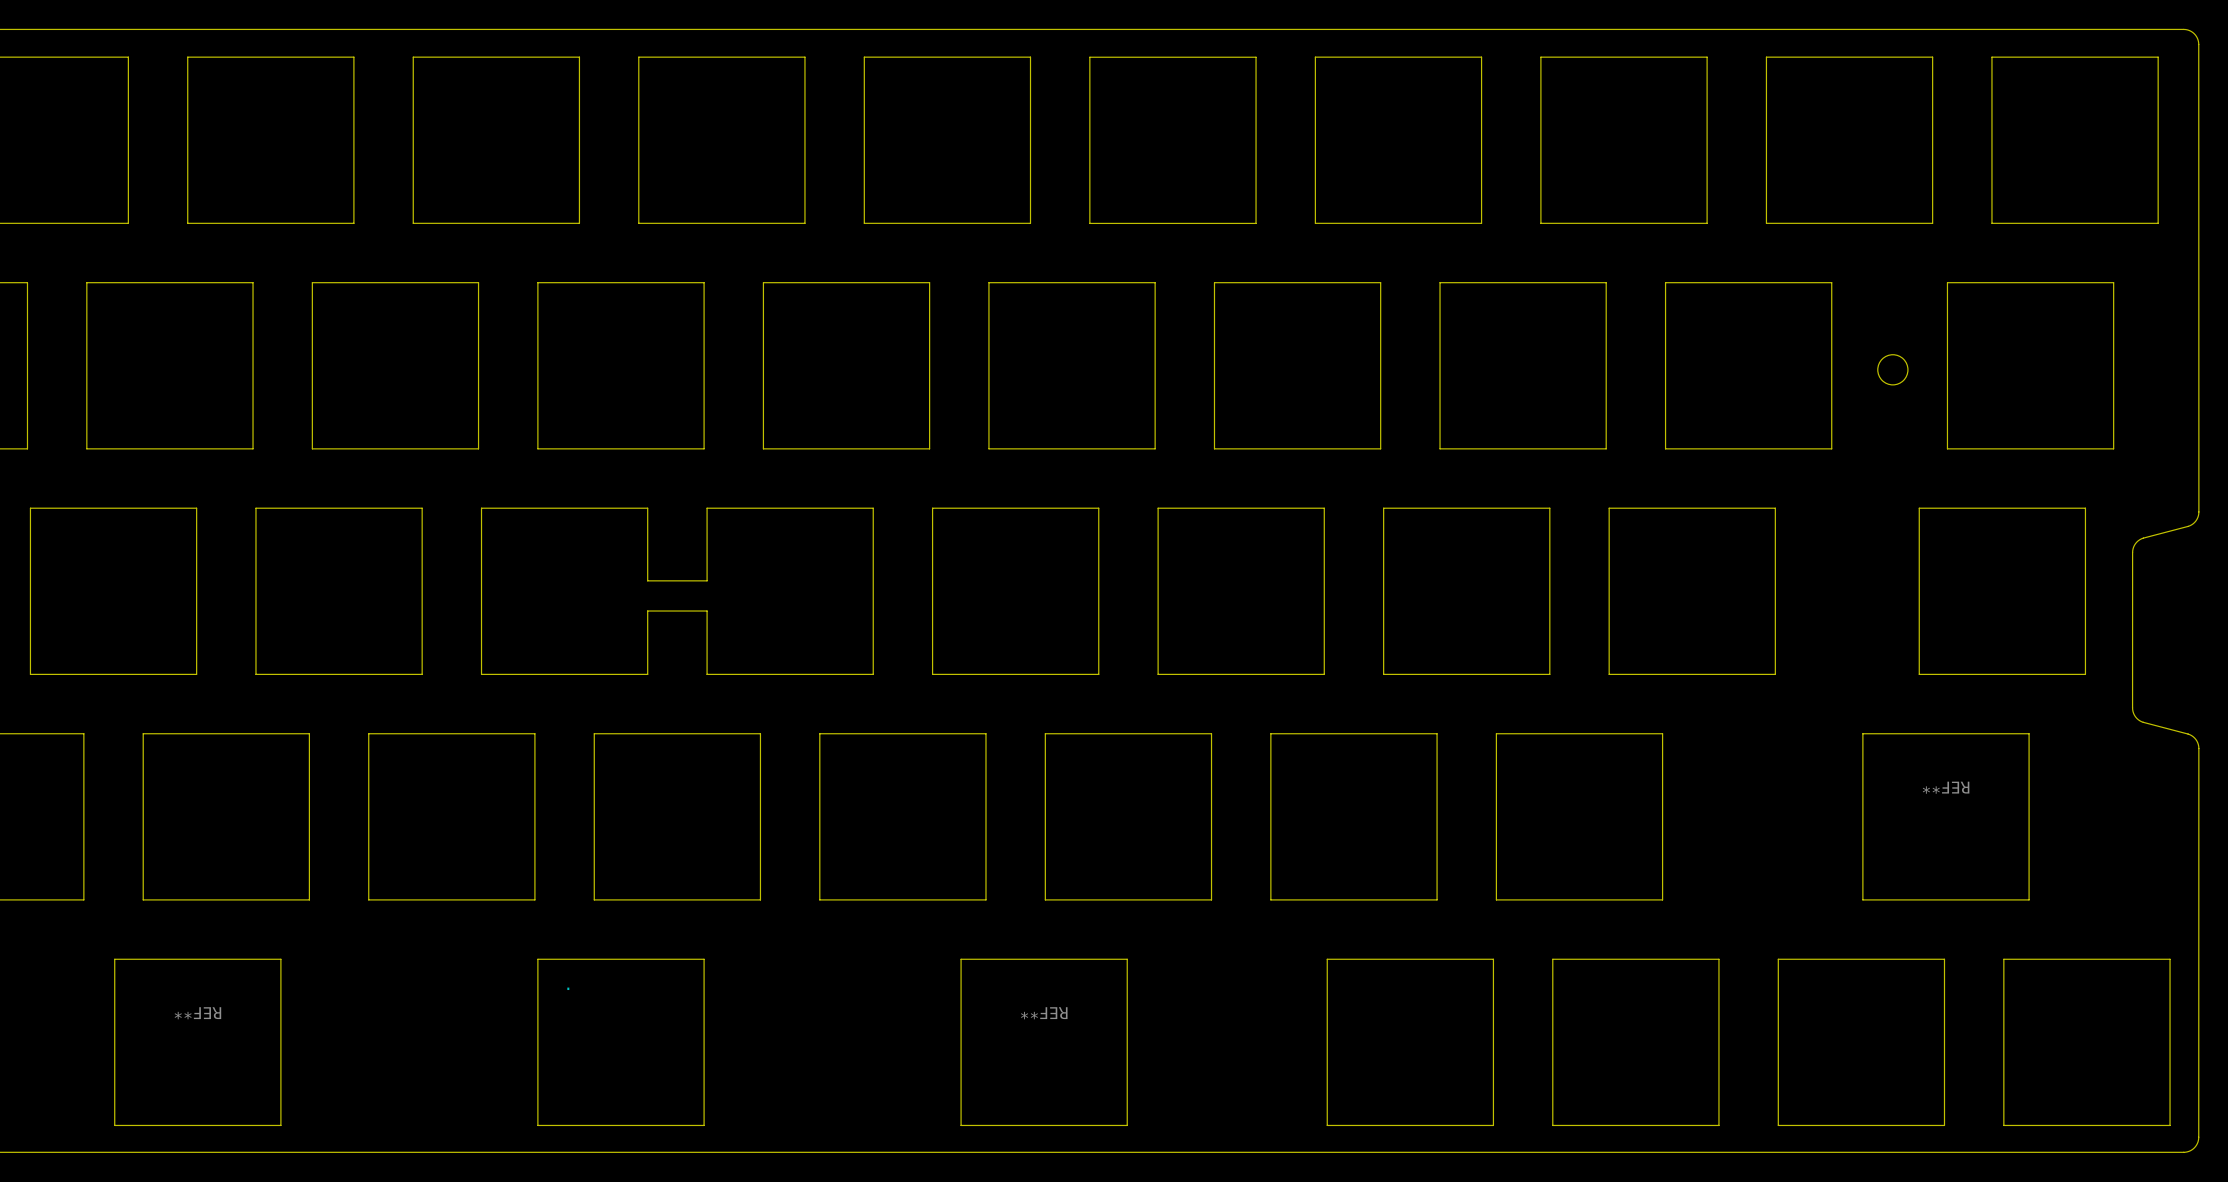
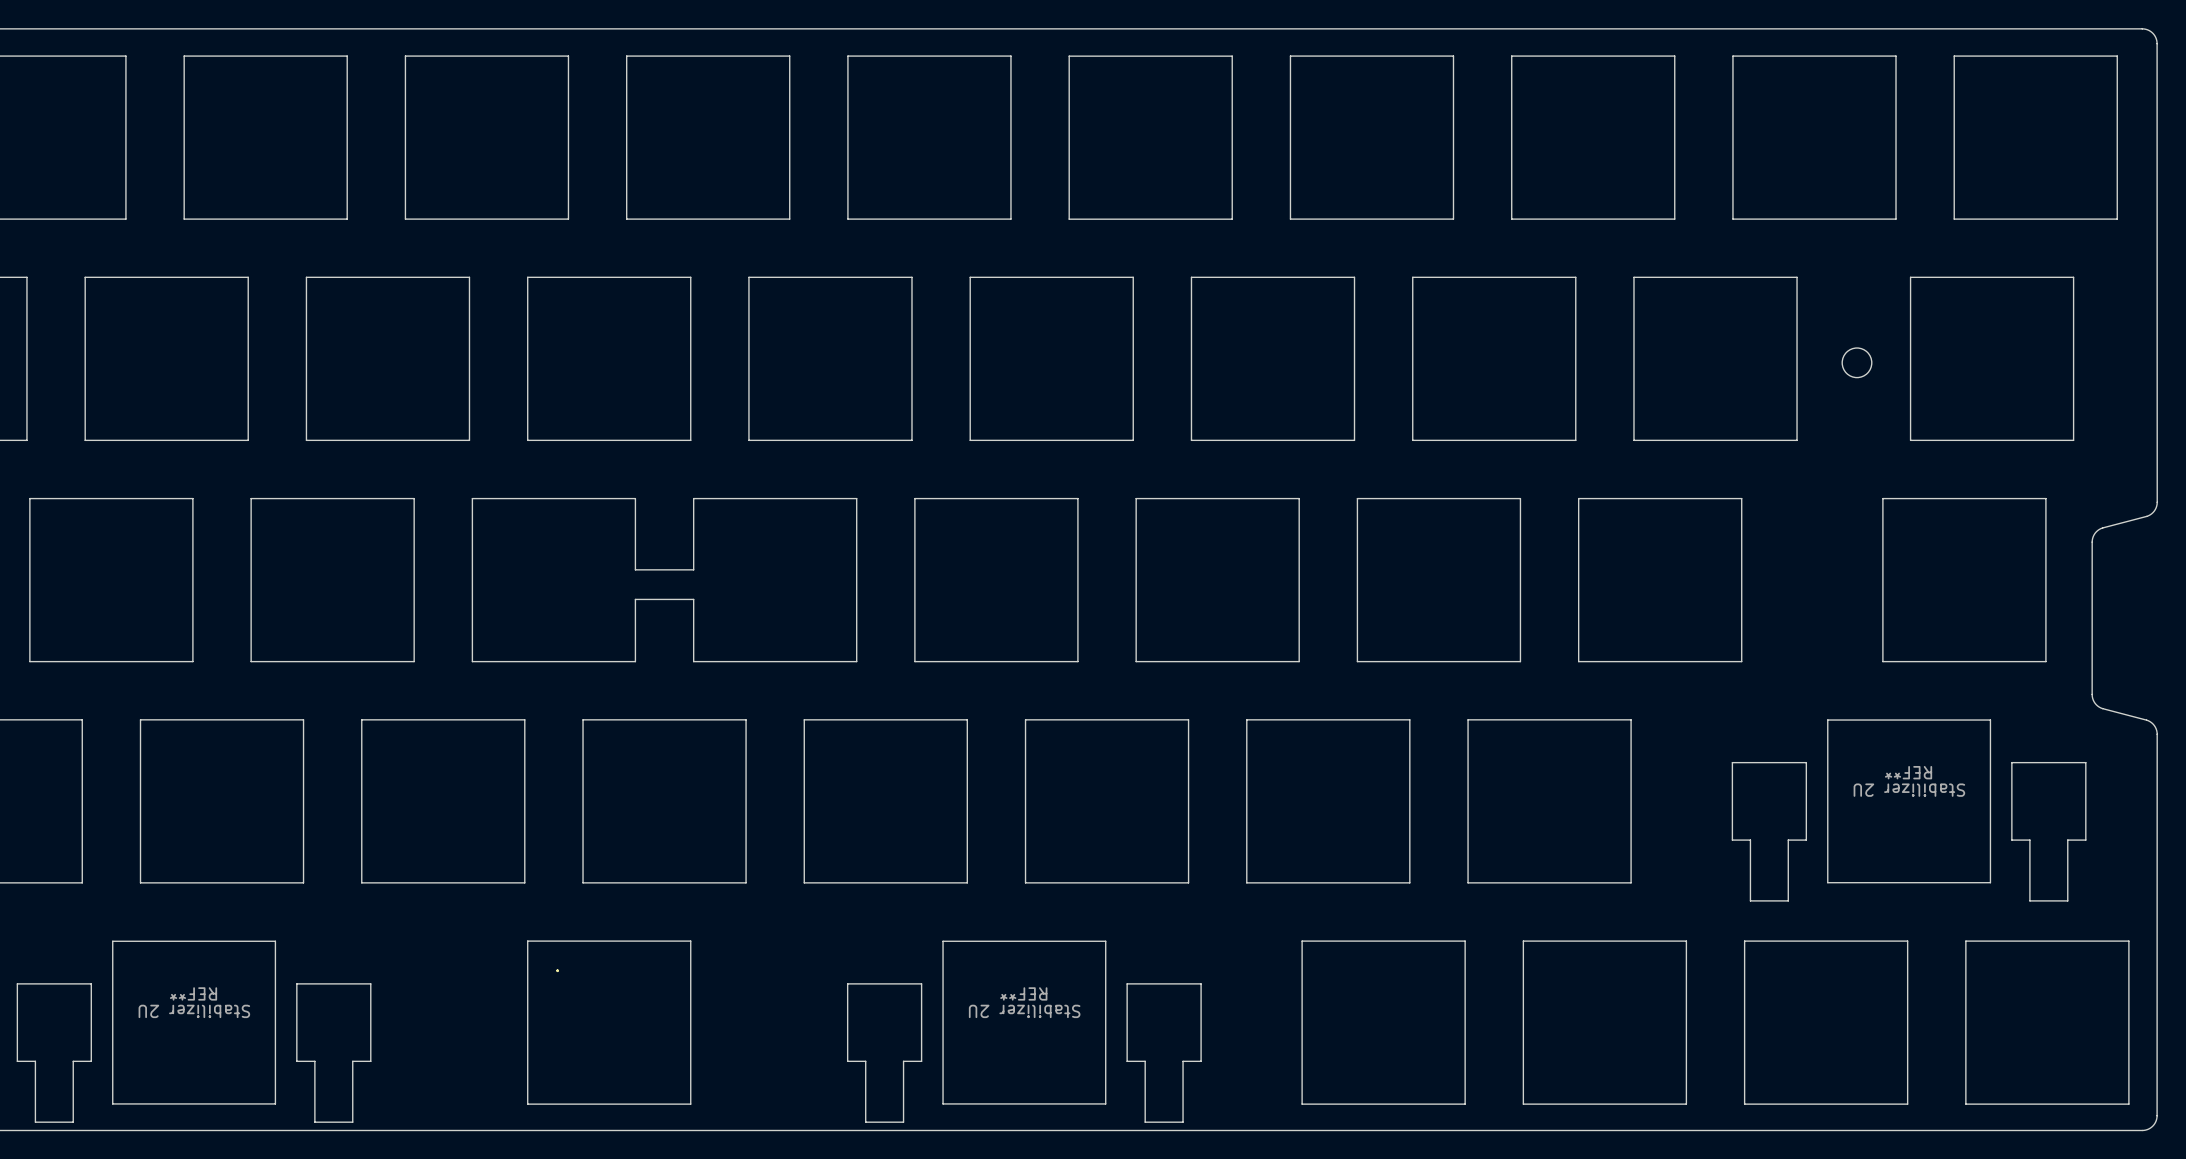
REF** footprint: [1862, 733, 2030, 901] -> [1732, 719, 2087, 902]
REF** value: none -> Stabilizer 2U (1909, 790)
REF** footprint: [114, 958, 282, 1126] -> [17, 940, 372, 1123]
REF** footprint: [960, 958, 1128, 1126] -> [847, 940, 1202, 1123]
REF** value: none -> Stabilizer 2U (194, 1011)
REF** value: none -> Stabilizer 2U (1024, 1011)

